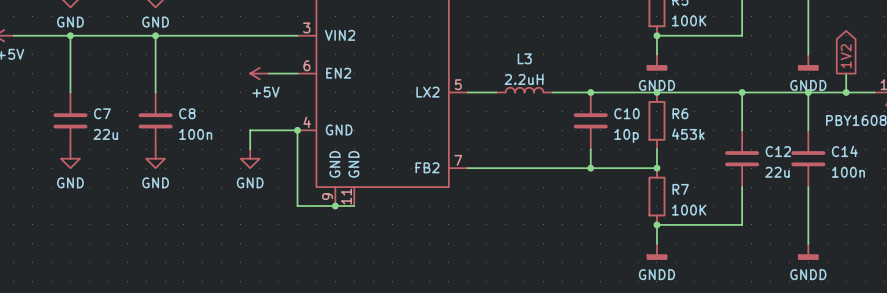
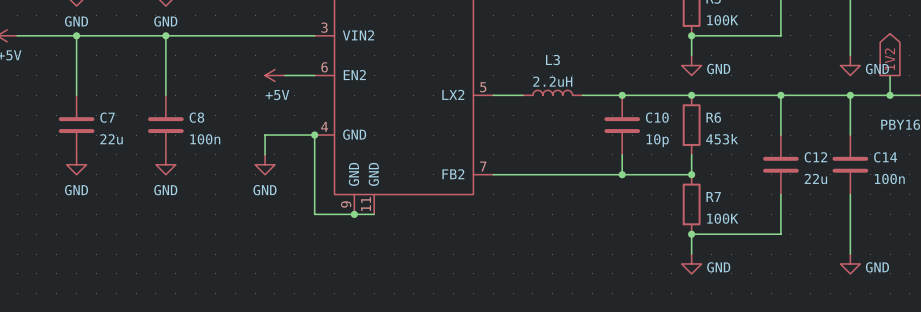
power symbol: GNDD (656, 62) -> GND (691, 65)
power symbol: GNDD (808, 62) -> GND (850, 65)
power symbol: GNDD (656, 251) -> GND (691, 263)
power symbol: GNDD (808, 251) -> GND (850, 263)

